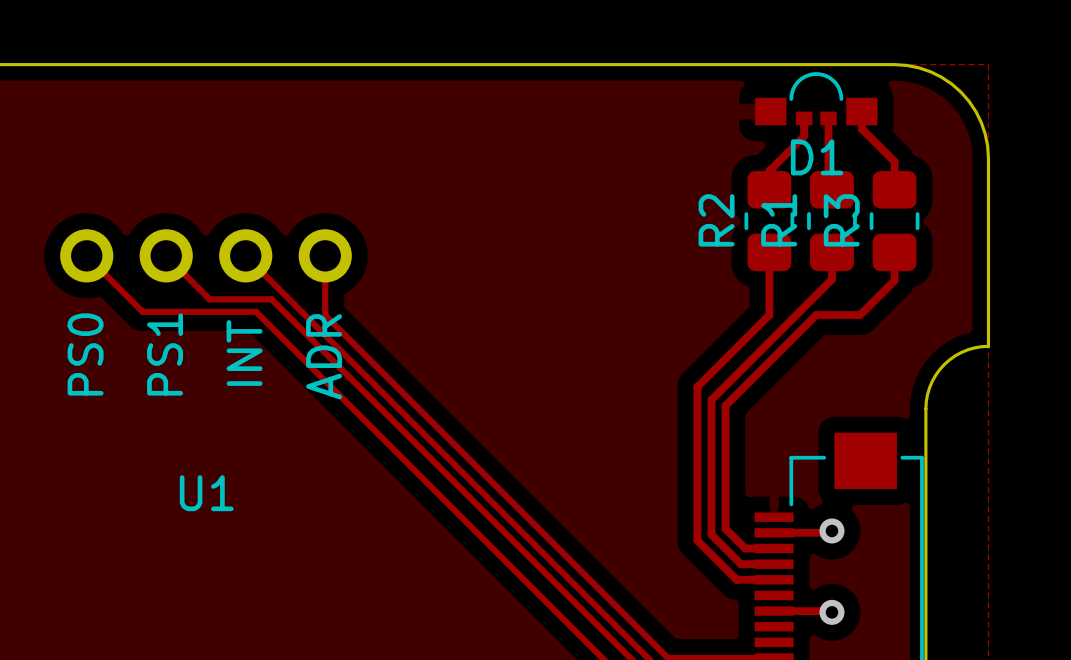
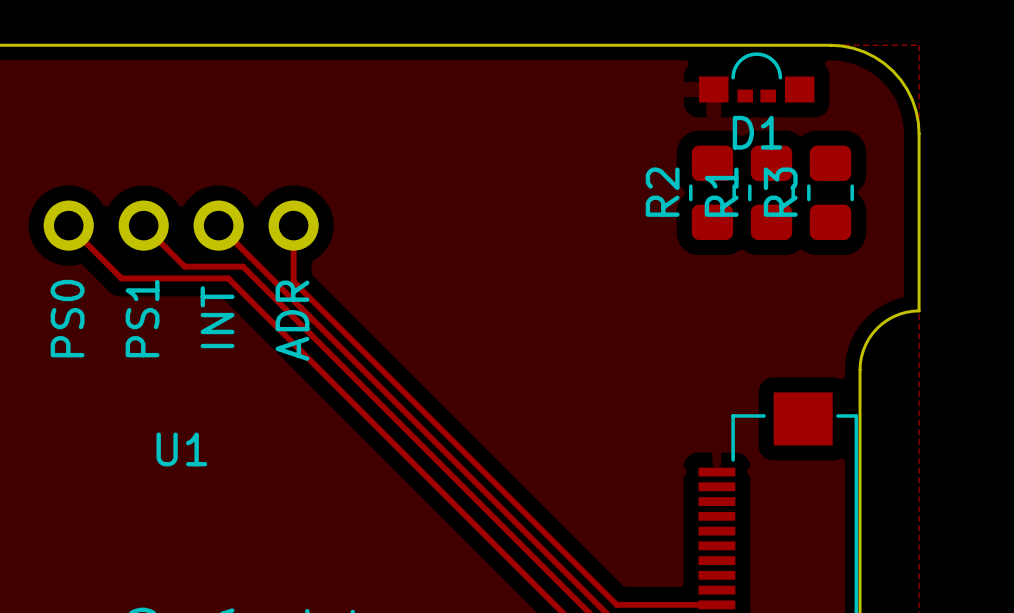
track: (861, 111) (861, 128) (894, 161) (894, 189) -> none
track: (804, 118) (804, 136) (769, 171) (769, 189) -> none
track: (828, 118) (828, 186) (831, 189) -> none
track: (769, 252) (769, 315) (697, 386) (697, 540) (736, 579) (774, 579) -> none
track: (831, 252) (831, 279) (711, 399) (711, 534) (740, 564) (774, 564) -> none
track: (894, 252) (894, 280) (860, 315) (816, 315) (725, 405) (725, 528) (745, 548) (774, 548) -> none
track: (831, 530) (830, 532) (774, 532) -> none
via: (831, 530) -> none
track: (774, 611) (831, 612) -> none
via: (831, 612) -> none

